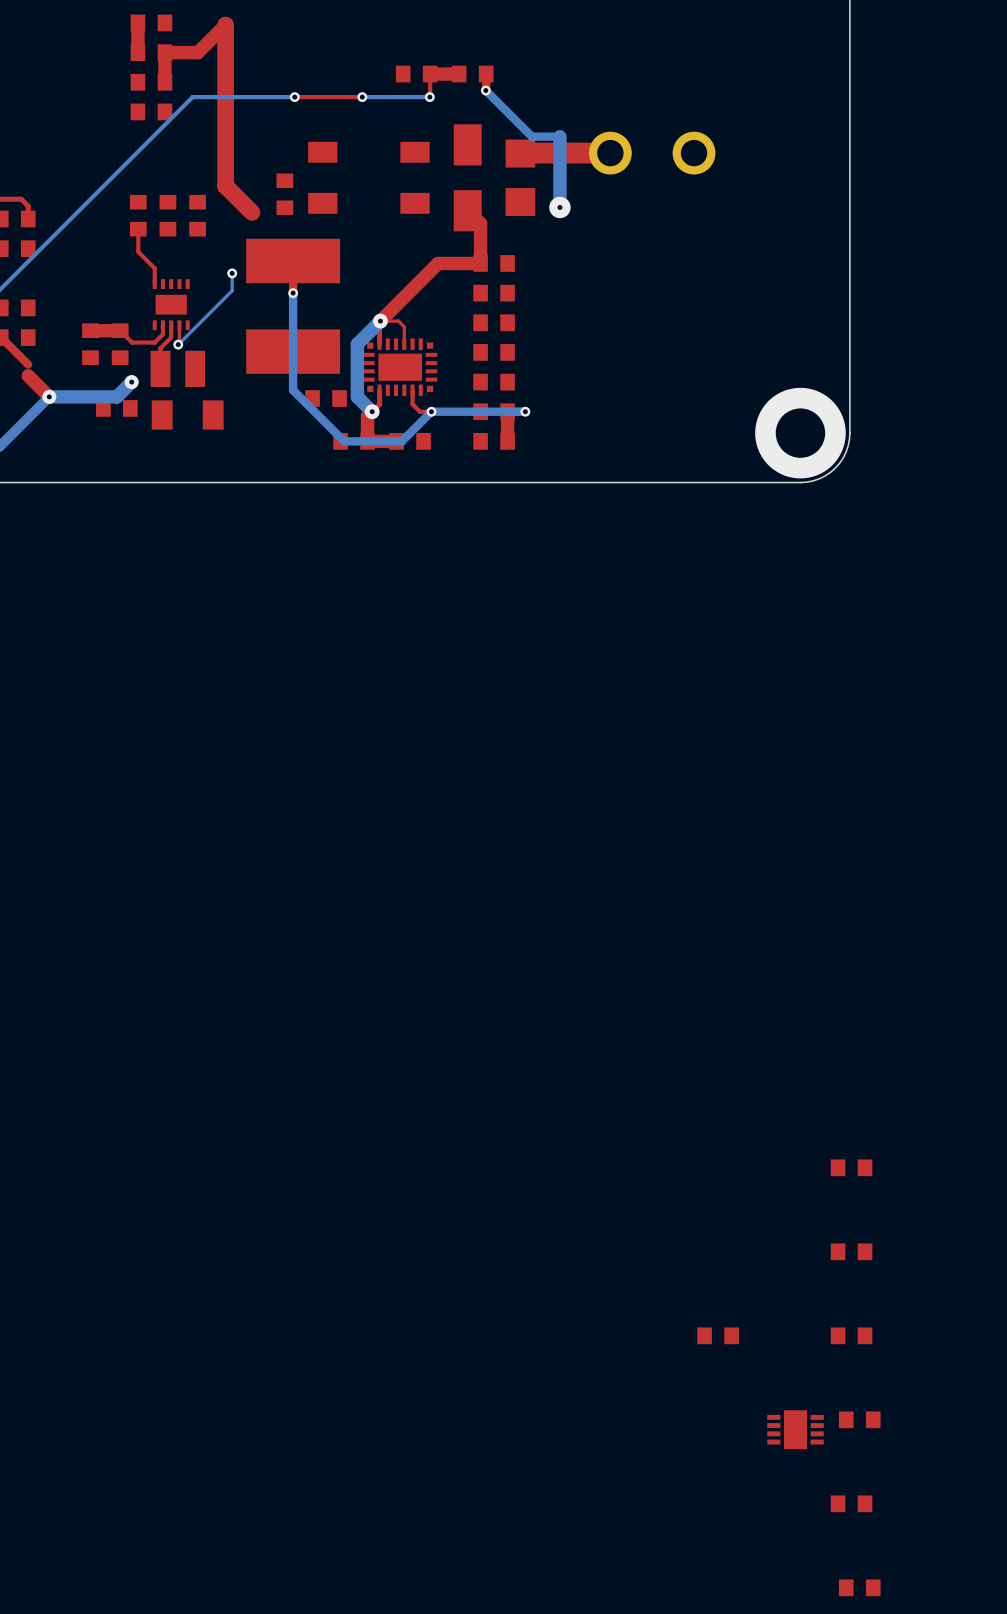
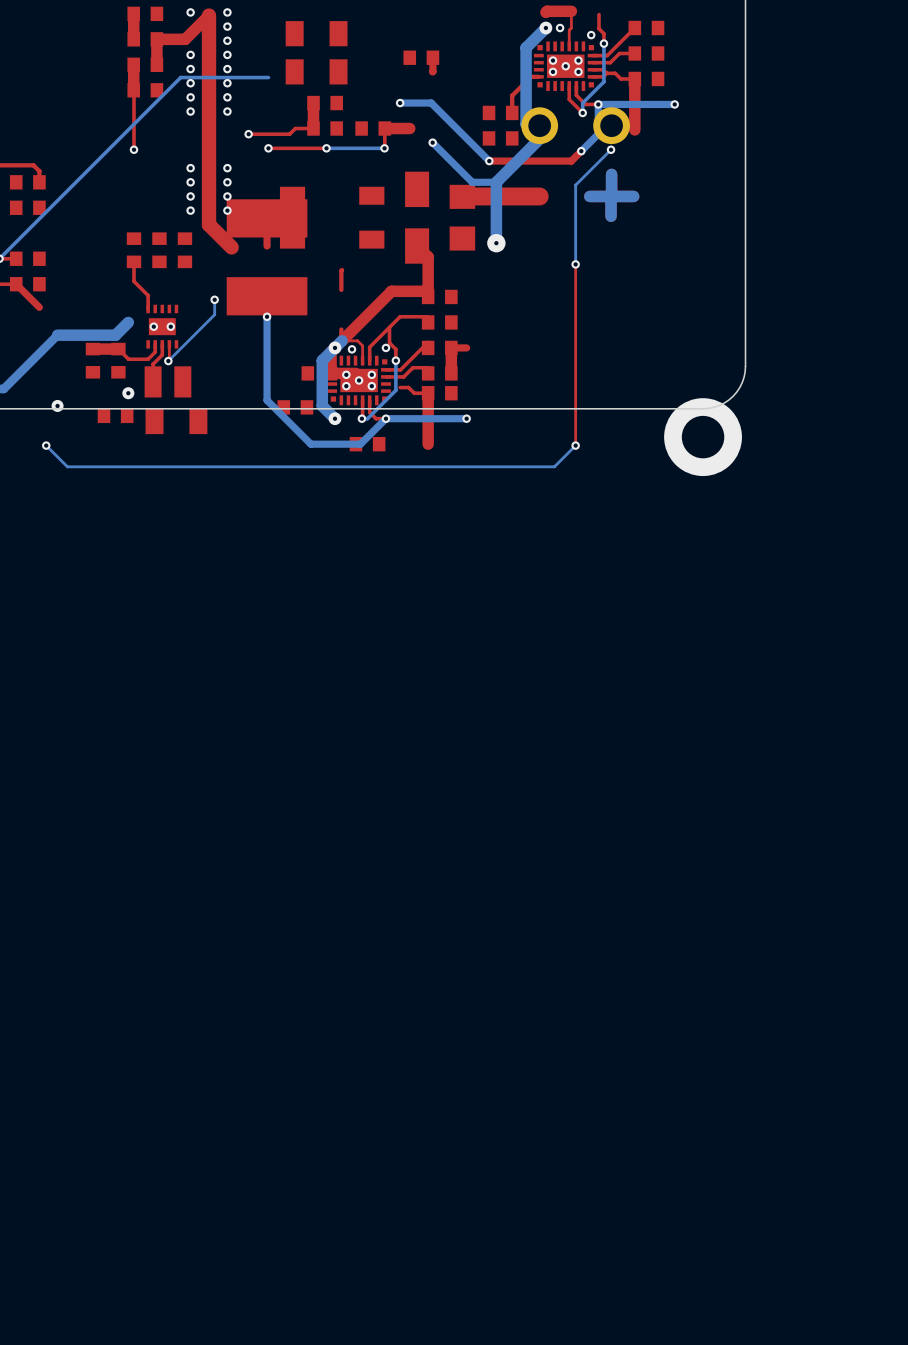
via: none -> (190, 12)
via: none -> (227, 12)
top track: none -> (545, 12) (571, 11) (569, 46)
top track: none -> (599, 14) (599, 28) (603, 33) (603, 43)
via: none -> (227, 26)
bottom track: none -> (545, 28) (526, 47) (526, 124) (540, 138) (496, 182)
via: none -> (545, 28)
via: none -> (560, 28)
top track: none -> (634, 28) (607, 55) (592, 55)
part: none -> (646, 28)
part: none -> (316, 33)
via: none -> (591, 35)
via: none -> (227, 40)
bottom track: none -> (603, 43) (603, 81) (582, 103) (582, 112)
via: none -> (603, 43)
top track: none -> (634, 53) (619, 53) (610, 62) (592, 62)
part: none -> (646, 53)
via: none -> (190, 54)
via: none -> (227, 54)
part: (416, 74) -> none
top track: (459, 74) (430, 74) (429, 97) -> (409, 128) (384, 128) (384, 148)
via: none -> (552, 60)
via: none -> (578, 60)
top track: none -> (133, 64) (133, 149)
via: none -> (565, 66)
via: none -> (190, 69)
via: none -> (227, 69)
top track: none -> (592, 69) (603, 69) (606, 73)
part: none -> (316, 71)
bottom track: (485, 90) (531, 136) (559, 136) (559, 207) -> none
via: (485, 90) -> none
via: none -> (552, 71)
via: none -> (578, 71)
top track: none -> (606, 73) (603, 76) (592, 76)
top track: none -> (606, 73) (615, 73) (620, 78) (634, 78) (634, 129)
top track: none -> (538, 76) (531, 76) (512, 95) (512, 112)
via: (294, 97) -> none
top track: (362, 97) (294, 97) -> (326, 148) (268, 148)
via: (362, 97) -> none
bottom track: (429, 97) (362, 97) -> (384, 148) (326, 148)
via: (429, 97) -> none
part: none -> (646, 78)
via: none -> (190, 83)
via: none -> (227, 83)
top track: none -> (569, 86) (569, 99) (582, 112)
top track: none -> (576, 86) (576, 95) (585, 104) (598, 104)
via: none -> (190, 97)
via: none -> (227, 97)
top track: none -> (313, 103) (313, 128) (295, 128) (289, 134) (248, 134)
part: none -> (325, 103)
bottom track: none -> (400, 103) (431, 103) (489, 161)
via: none -> (400, 103)
via: none -> (598, 104)
bottom track: none -> (674, 104) (598, 104) (598, 134) (581, 151)
via: none -> (674, 104)
via: none -> (190, 111)
via: none -> (227, 111)
part: none -> (500, 112)
via: none -> (582, 112)
top track: (610, 153) (520, 153) -> (539, 196) (462, 196)
part: none -> (325, 128)
part: none -> (373, 128)
via: none -> (248, 134)
part: none -> (500, 138)
bottom track: none -> (432, 142) (472, 182) (496, 182)
via: none -> (432, 142)
part: (322, 177) -> none
part: (415, 177) -> none
part position: (467, 177) -> (417, 217)
part position: (520, 177) -> (462, 217)
via: none -> (268, 148)
via: none -> (326, 148)
via: none -> (384, 148)
via: none -> (133, 149)
bottom track: none -> (611, 149) (575, 185) (575, 264)
via: none -> (611, 149)
top track: none -> (581, 151) (571, 161) (489, 161)
via: none -> (581, 151)
top track: (225, 186) (251, 212) -> (209, 153) (209, 224) (231, 247)
part: (284, 194) -> none
via: none -> (489, 161)
via: none -> (190, 168)
via: none -> (227, 168)
via position: (559, 207) -> (496, 243)
bottom track: none -> (611, 174) (611, 216)
top track: (467, 210) (480, 223) (480, 263) (438, 263) (380, 321) (398, 321) (404, 326) (404, 344) -> (417, 246) (428, 257) (428, 291) (391, 291) (342, 340) (357, 340) (362, 345) (362, 360)
part: (138, 215) -> none
part: (167, 215) -> none
part: (197, 215) -> none
via: none -> (190, 182)
via: none -> (227, 182)
bottom track: none -> (496, 182) (496, 243)
top track: (138, 229) (138, 251) (154, 268) (154, 284) -> (133, 261) (133, 281) (148, 295) (148, 309)
via: none -> (190, 196)
via: none -> (227, 196)
bottom track: none -> (633, 196) (589, 196)
via: none -> (190, 210)
via: none -> (227, 210)
part: none -> (292, 217)
part: none -> (371, 217)
part: (494, 263) -> none
bottom track: (232, 273) (232, 290) (178, 344) -> (214, 299) (214, 314) (168, 361)
via: (232, 273) -> none
part footprint: [152, 279, 190, 331] -> [152, 232, 167, 269]
bottom track: (293, 293) (293, 375) -> none
via: (293, 293) -> none
part: (494, 293) -> none
part: none -> (133, 250)
part: none -> (184, 250)
top track: none -> (575, 264) (575, 445)
via: none -> (575, 264)
bottom track: (380, 321) (357, 344) (357, 396) (372, 411) -> (342, 340) (322, 360) (322, 405) (335, 418)
via: (380, 321) -> none
part: (494, 322) -> none
top track: (162, 325) (162, 334) (154, 342) (132, 342) (120, 330) (90, 330) -> (155, 344) (155, 352) (148, 359) (128, 359) (118, 349) (92, 349)
top track: (171, 325) (171, 337) (160, 348) (160, 368) -> (162, 344) (162, 355) (153, 364) (153, 381)
top track: (179, 325) (178, 344) -> (169, 344) (168, 361)
part: (90, 344) -> none
part: (120, 344) -> none
via: (178, 344) -> none
via: none -> (214, 299)
part position: (400, 367) -> (565, 66)
part position: (177, 368) -> (167, 381)
top track: (28, 375) (49, 396) -> none
via: none -> (267, 316)
top track: none -> (428, 316) (400, 316) (369, 347) (369, 360)
via: (131, 382) -> none
via: none -> (153, 326)
part: none -> (162, 326)
via: none -> (170, 326)
top track: none -> (389, 327) (389, 342) (395, 349) (395, 360)
bottom track: (293, 390) (344, 441) (401, 441) (431, 411) (525, 411) -> (267, 329) (267, 400) (310, 444) (360, 444) (385, 418) (466, 418)
top track: (412, 390) (412, 404) (419, 411) (431, 411) -> (369, 400) (369, 412) (376, 418) (385, 418)
via: (49, 396) -> none
part: (326, 398) -> none
top track: none -> (428, 342) (400, 369) (385, 369)
part: (116, 408) -> none
via: (525, 411) -> none
via: none -> (351, 349)
part position: (187, 415) -> (176, 421)
part: none -> (92, 360)
part: none -> (118, 360)
via: none -> (168, 361)
bottom track: none -> (395, 360) (395, 390) (367, 418) (361, 418)
via: none -> (395, 360)
part footprint: [389, 433, 431, 450] -> [327, 355, 391, 406]
via position: (800, 433) -> (703, 437)
top track: none -> (428, 367) (412, 367) (403, 376) (385, 376)
via: none -> (346, 374)
via: none -> (371, 374)
via: none -> (359, 380)
via: none -> (346, 386)
via: none -> (371, 386)
top track: none -> (400, 387) (408, 387) (414, 393) (428, 393) (428, 444)
via: none -> (128, 393)
part: none -> (439, 393)
top track: none -> (362, 400) (361, 418)
via: none -> (57, 405)
part: none -> (295, 407)
part: none -> (115, 415)
via: none -> (335, 418)
via: none -> (361, 418)
via: none -> (385, 418)
via: none -> (466, 418)
part: none -> (367, 444)
via: none -> (46, 445)
bottom track: none -> (575, 445) (554, 466) (67, 466) (46, 445)
via: none -> (575, 445)
part: (851, 1167) -> none
part: (851, 1251) -> none
part: (718, 1335) -> none
part: (851, 1335) -> none
part: (859, 1419) -> none
part: (795, 1429) -> none
part: (851, 1503) -> none

